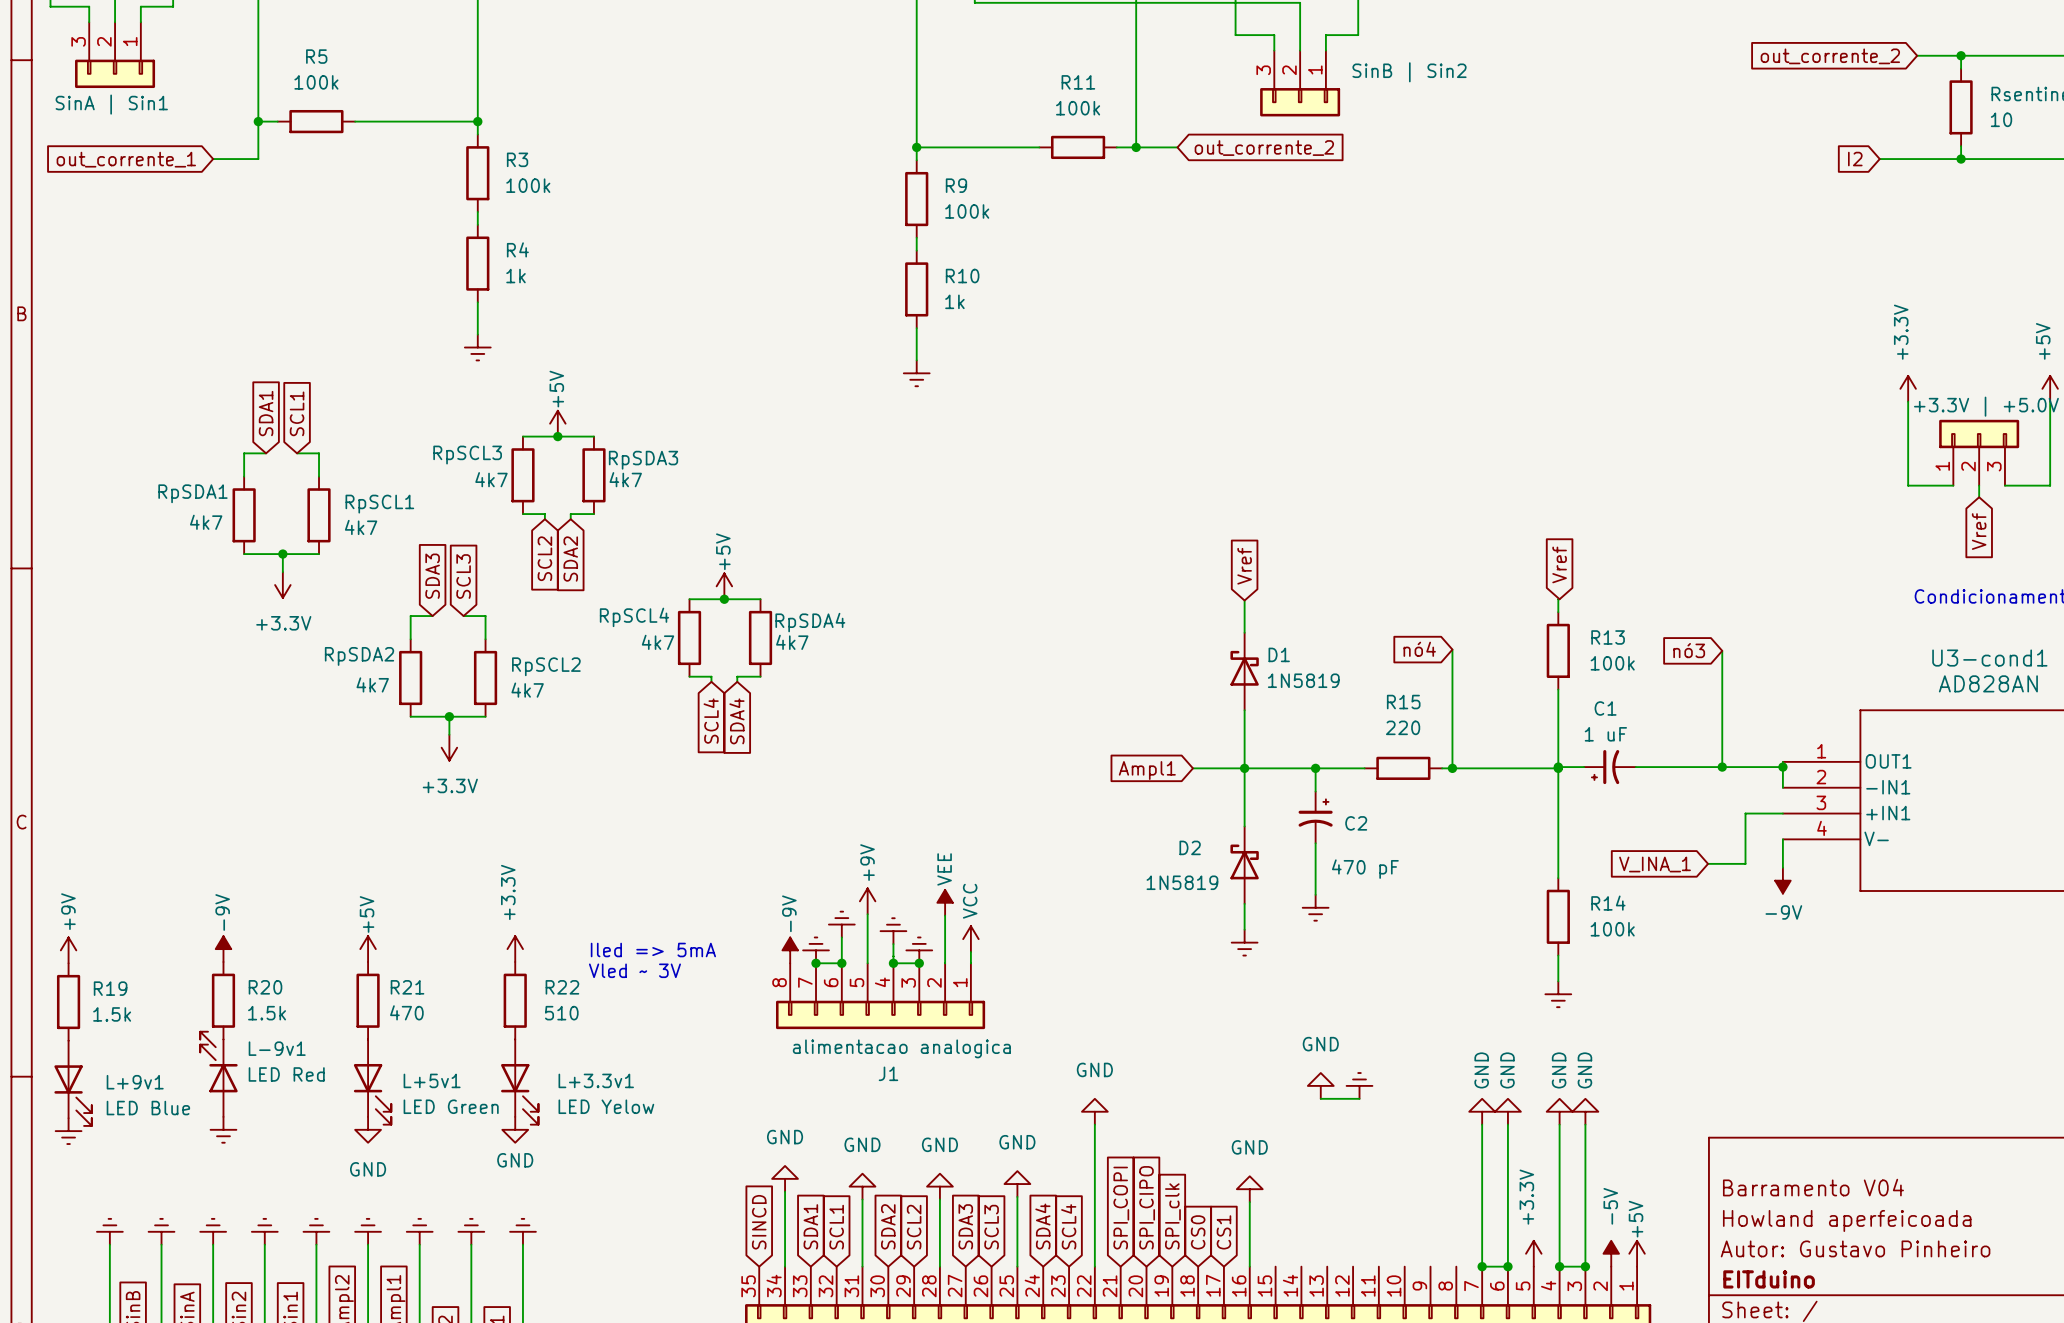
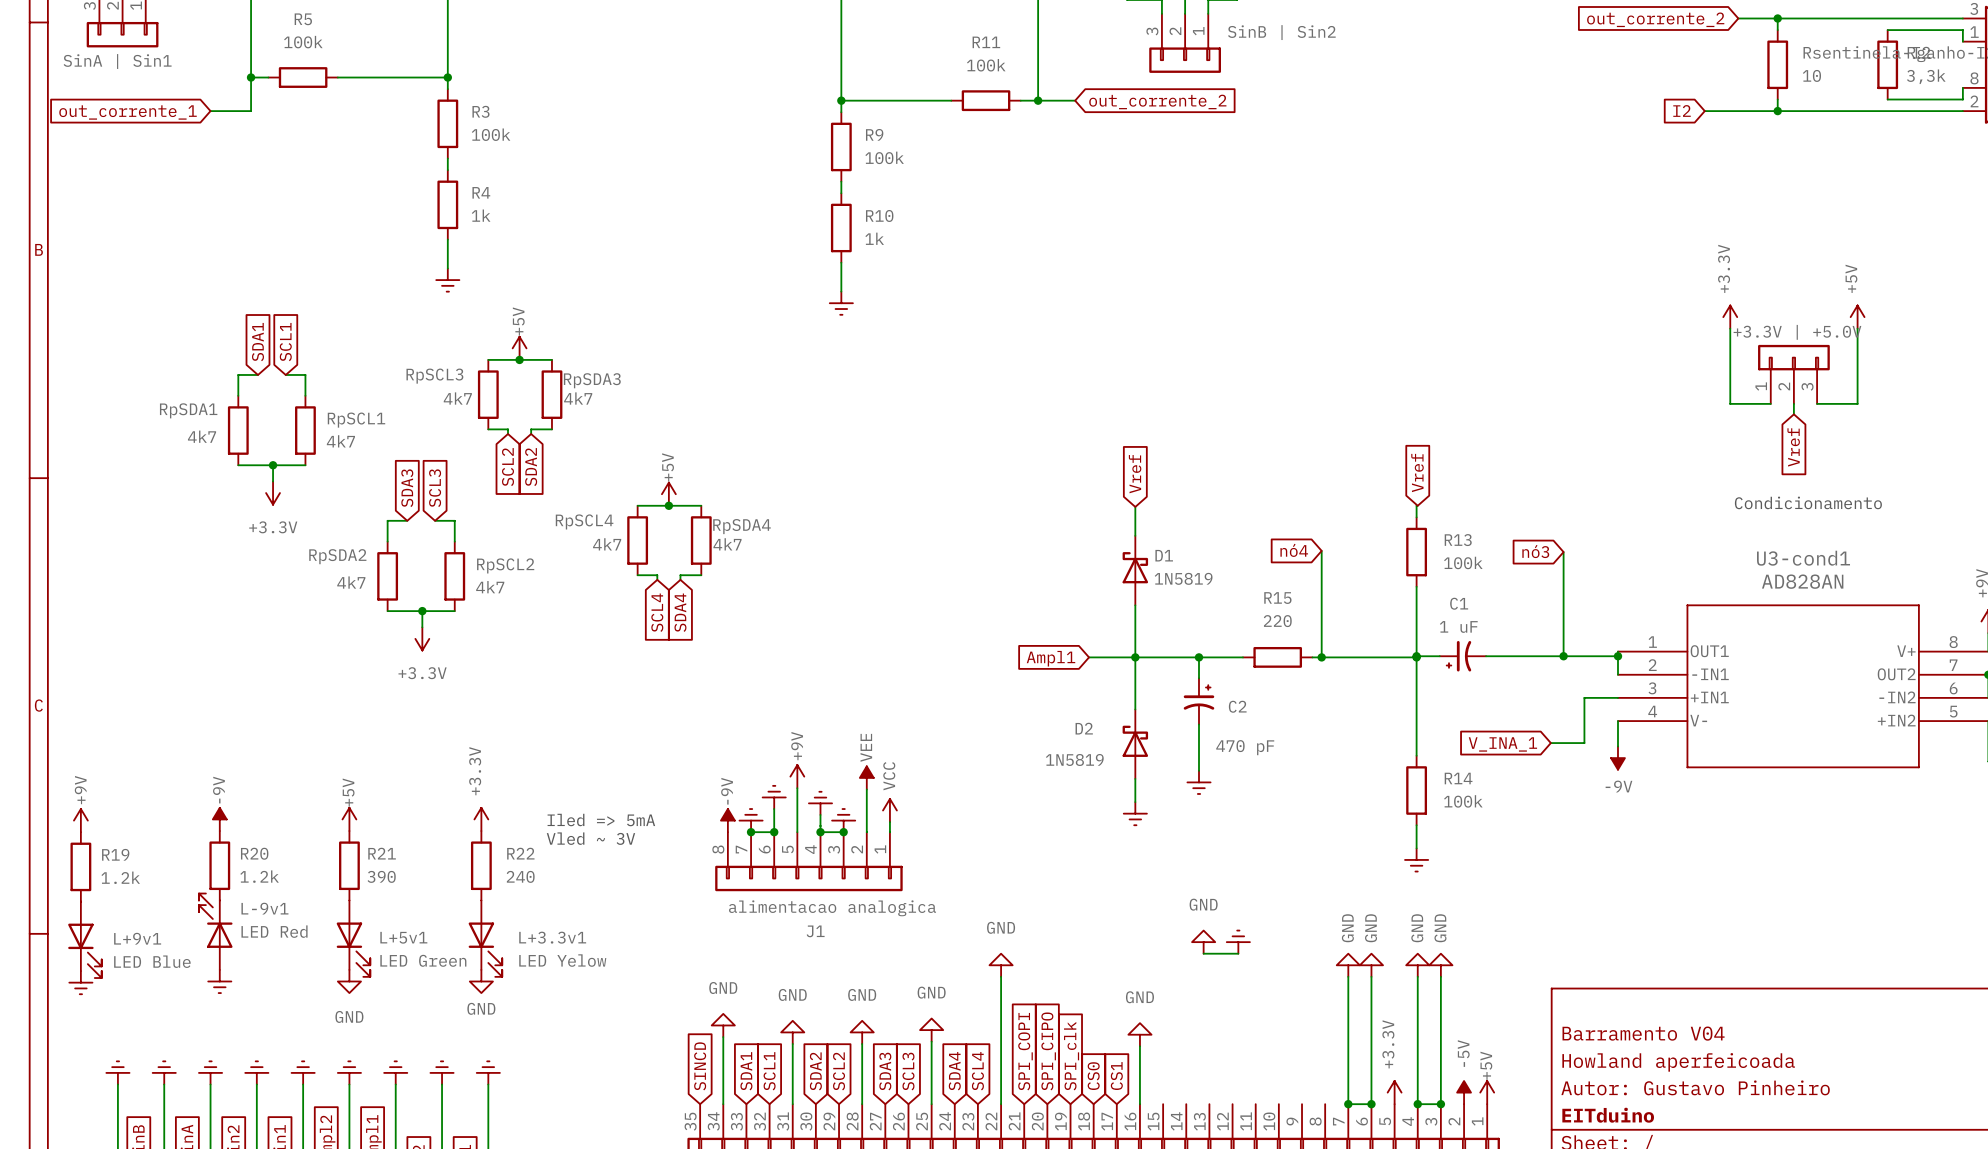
R21 value: 470 (406, 1012) -> 390 (381, 876)
R20 value: 1.5k (267, 1013) -> 1.2k (259, 876)
R22 value: 510 (561, 1013) -> 240 (520, 876)
R19 value: 1.5k (112, 1014) -> 1.2k (120, 877)

